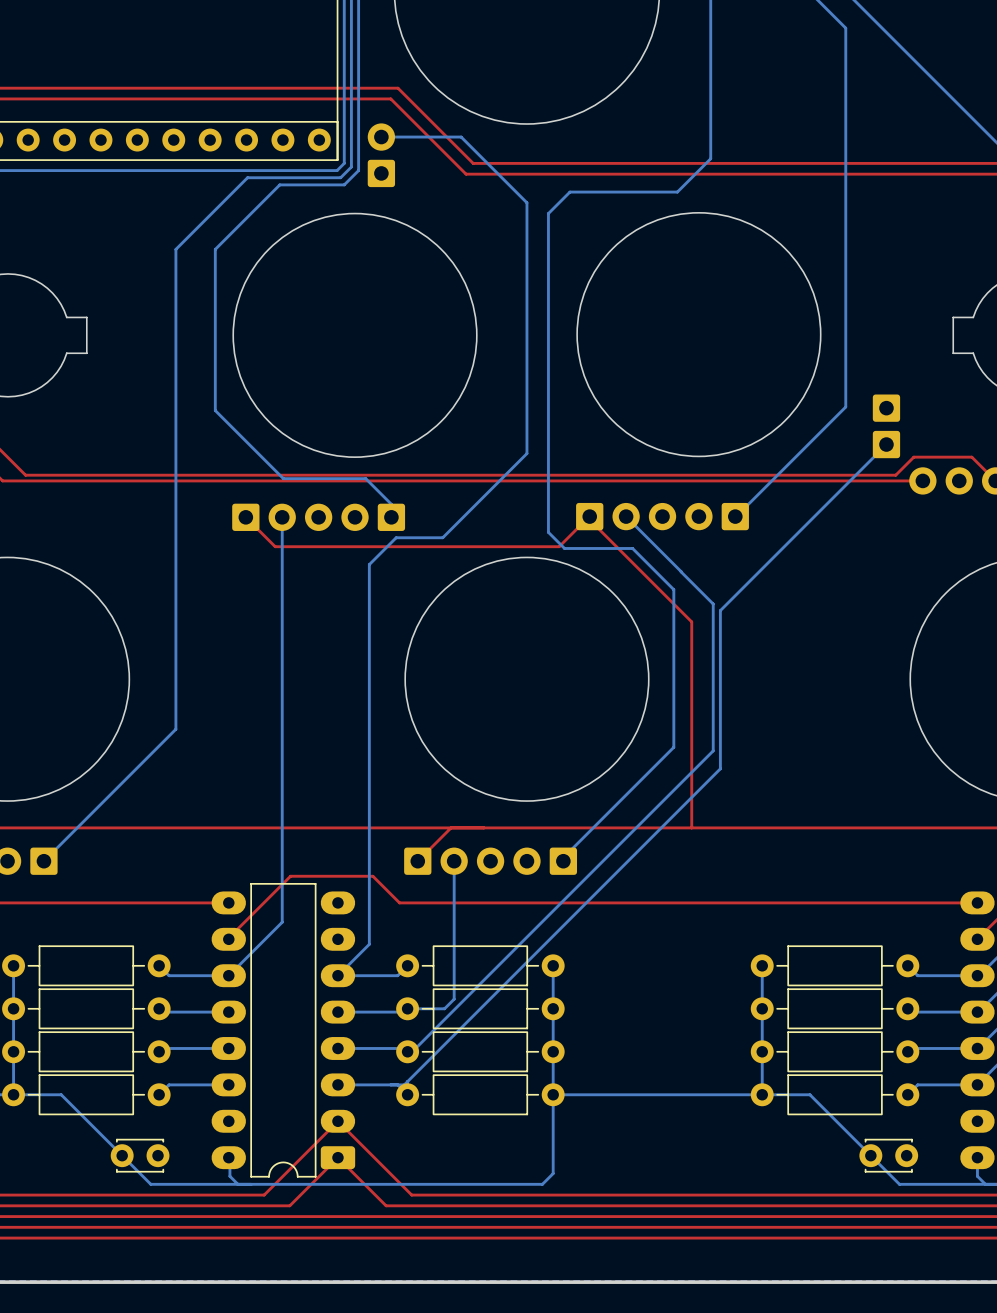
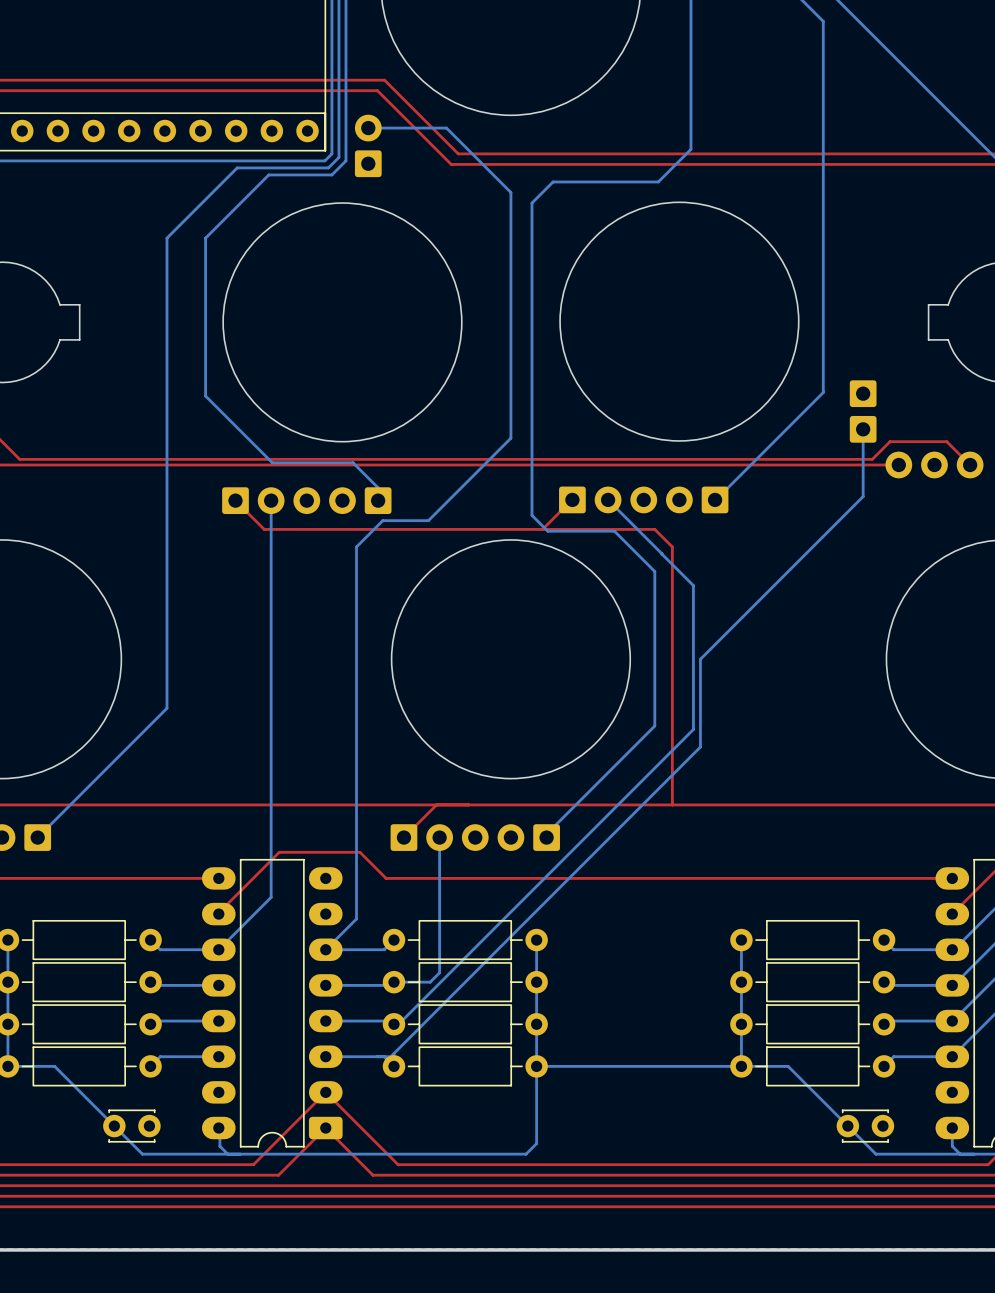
bottom track: (886, 444) (720, 610) (720, 679) -> (863, 429) (863, 496) (700, 659)
top track: (589, 519) (691, 621) -> (542, 529) (654, 529) (672, 546) (672, 603)

